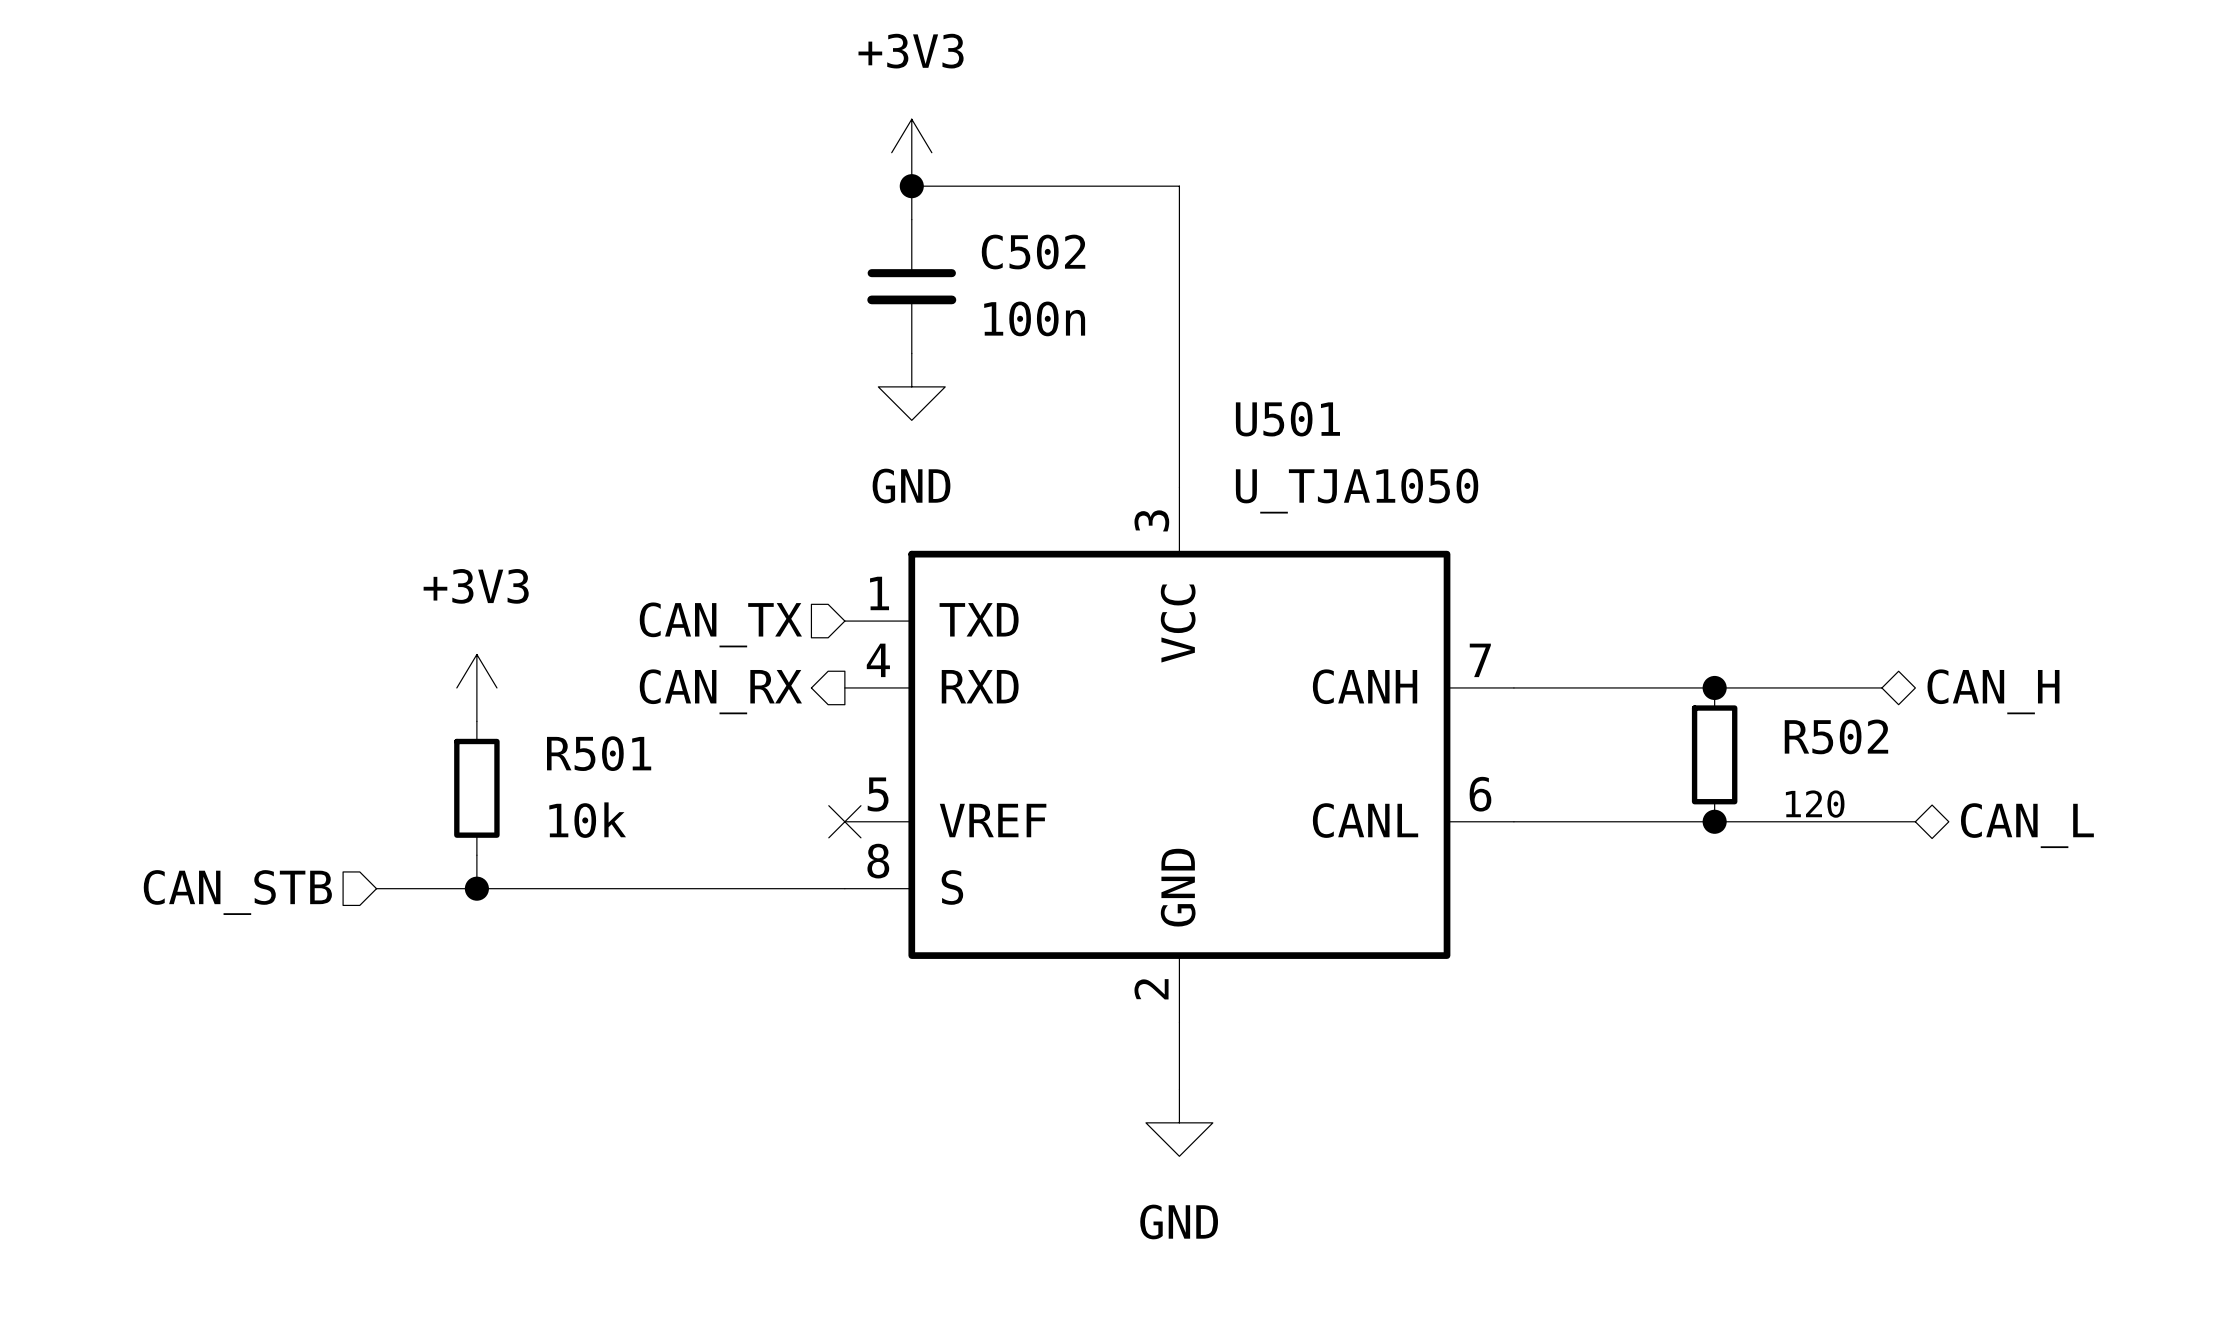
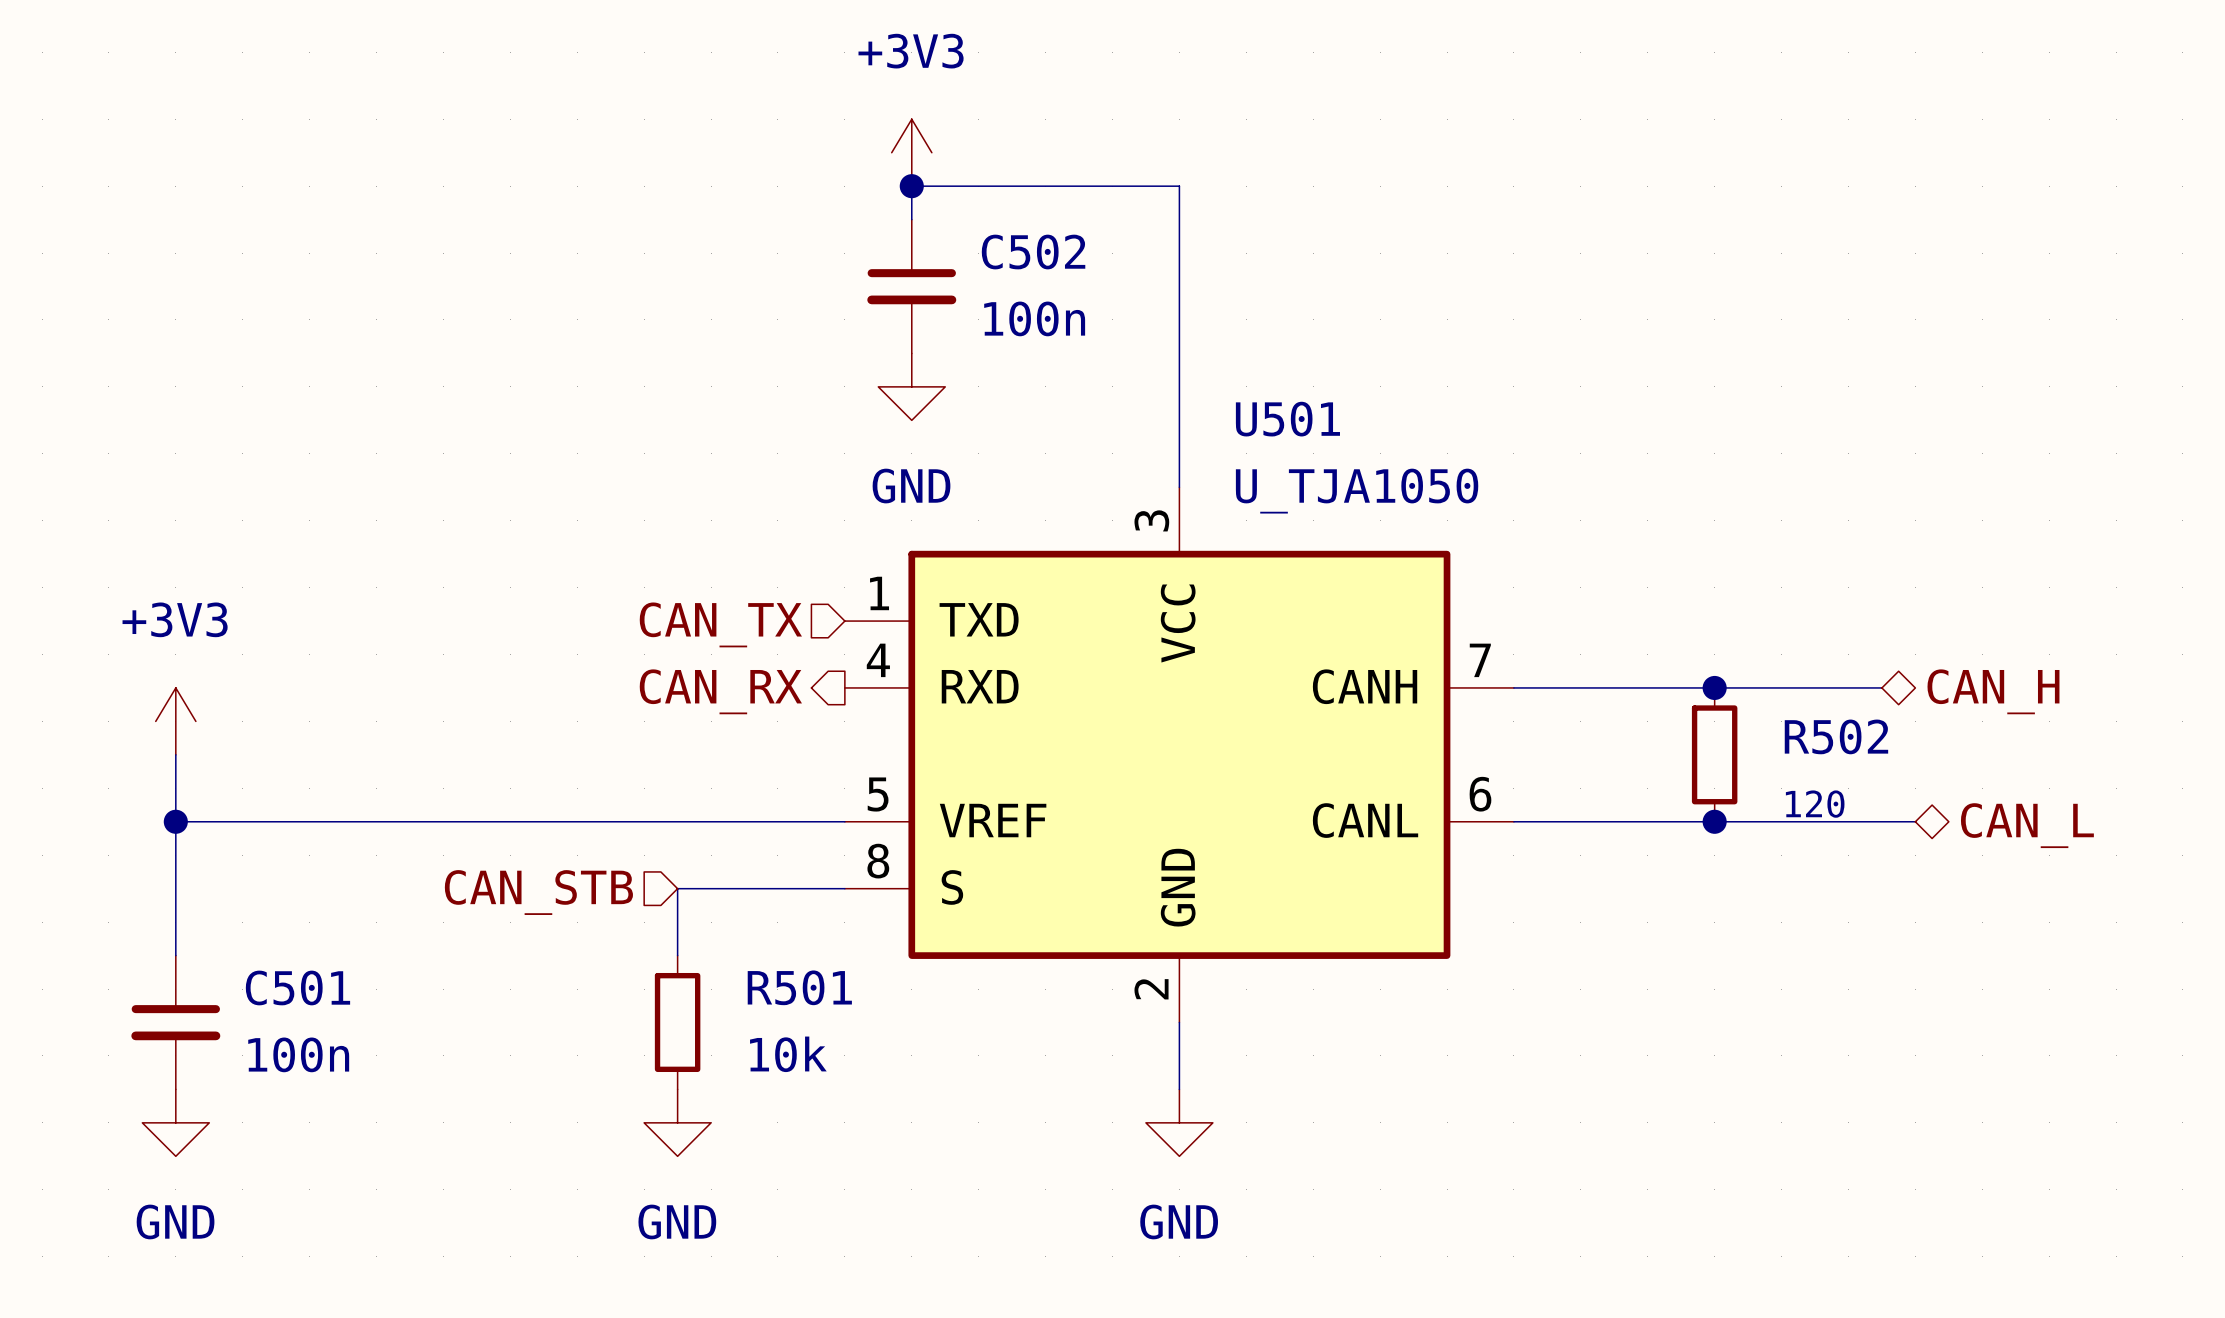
power symbol position: +3V3 (476, 687) -> +3V3 (175, 721)
wire: none -> (175, 754) (175, 955)
R501 position: (476, 788) -> (677, 1022)
wire: none -> (175, 821) (844, 821)
junction: none -> (175, 821)
no-connect mark: (844, 821) -> none
wire: (476, 855) (476, 888) -> none
wire: (376, 888) (677, 888) -> (677, 955) (677, 888)
junction: (476, 888) -> none
hierarchical label position: CAN_STB (237, 892) -> CAN_STB (538, 892)
C501: none -> (175, 1022)
power symbol: none -> GND (175, 1122)
power symbol: none -> GND (677, 1122)

